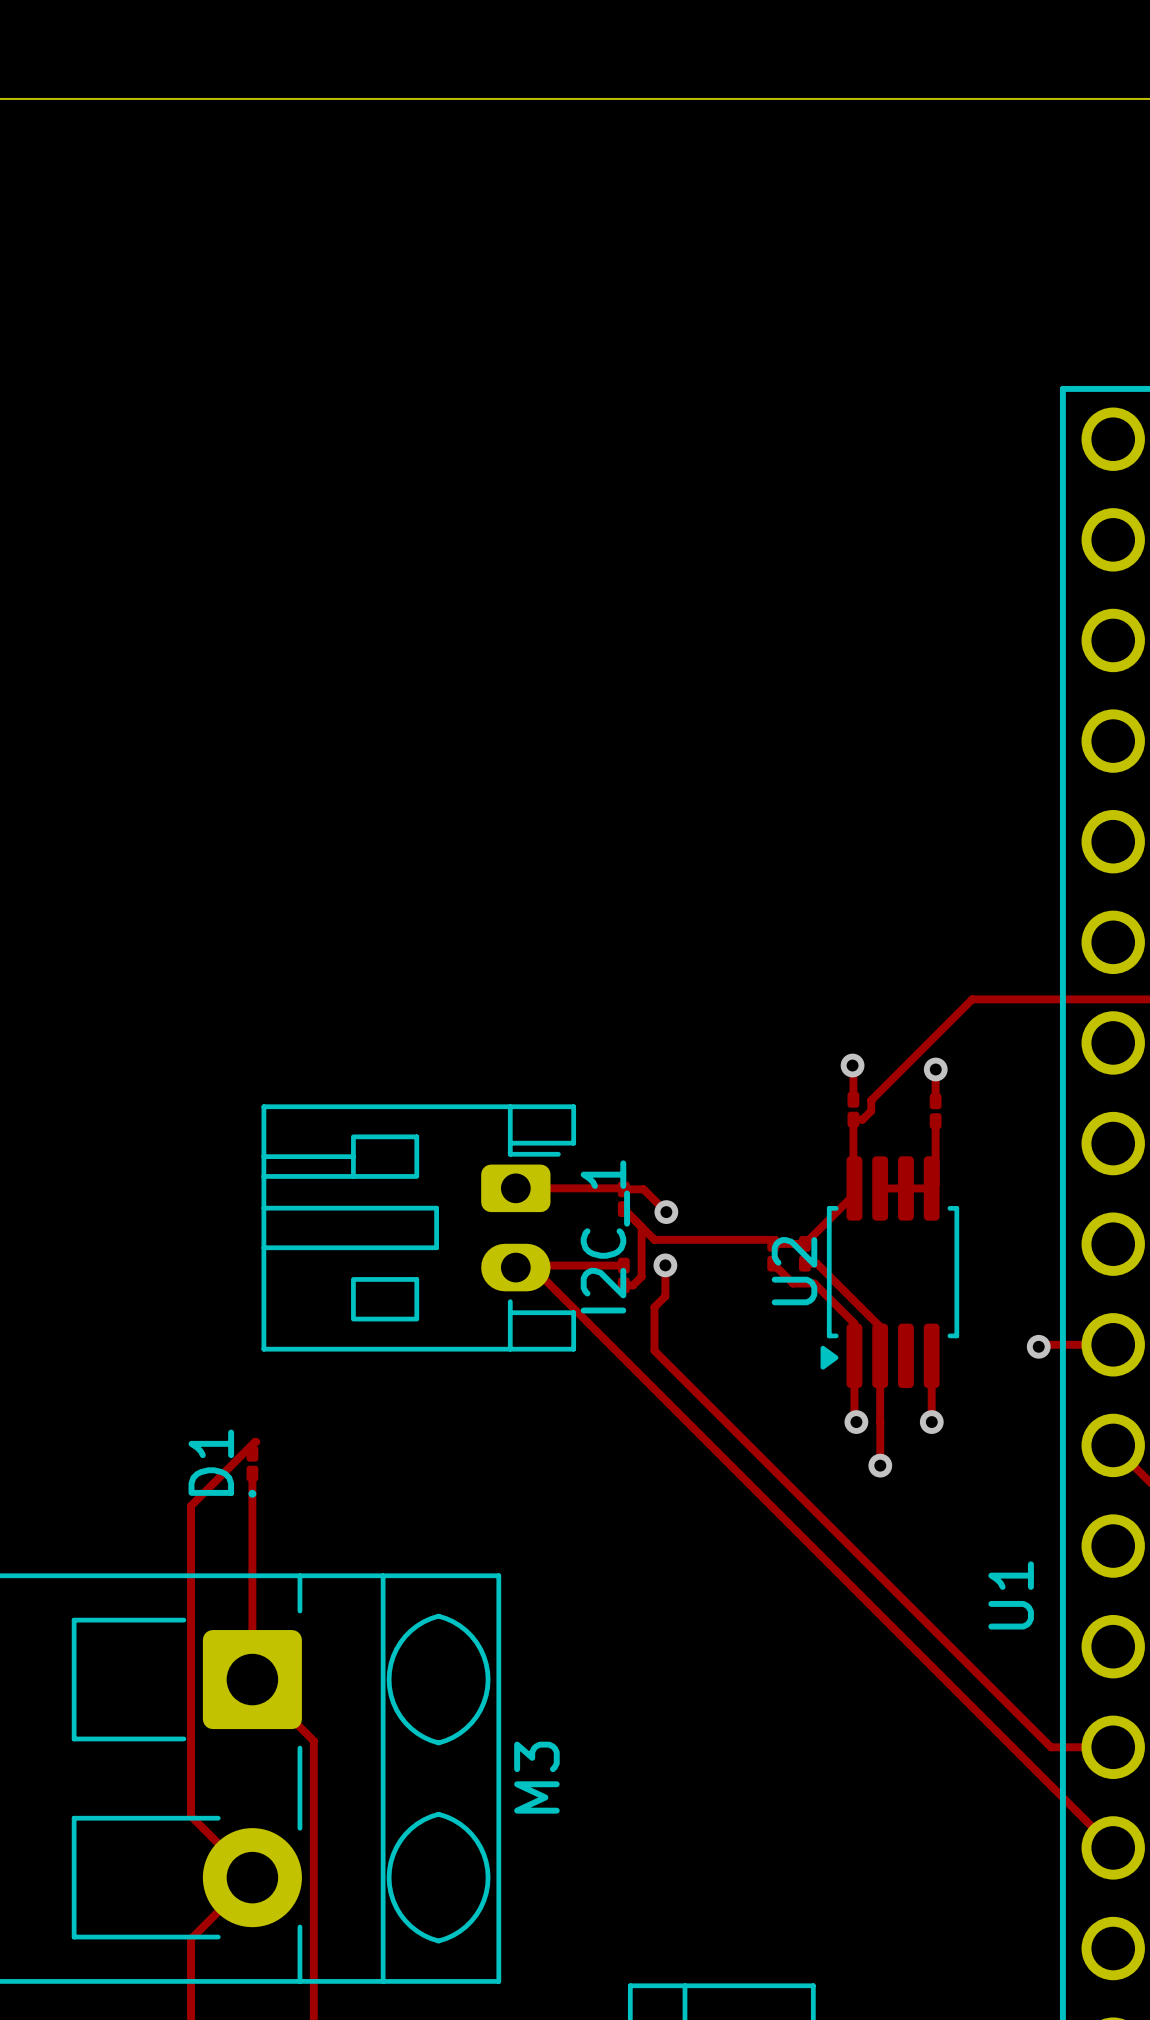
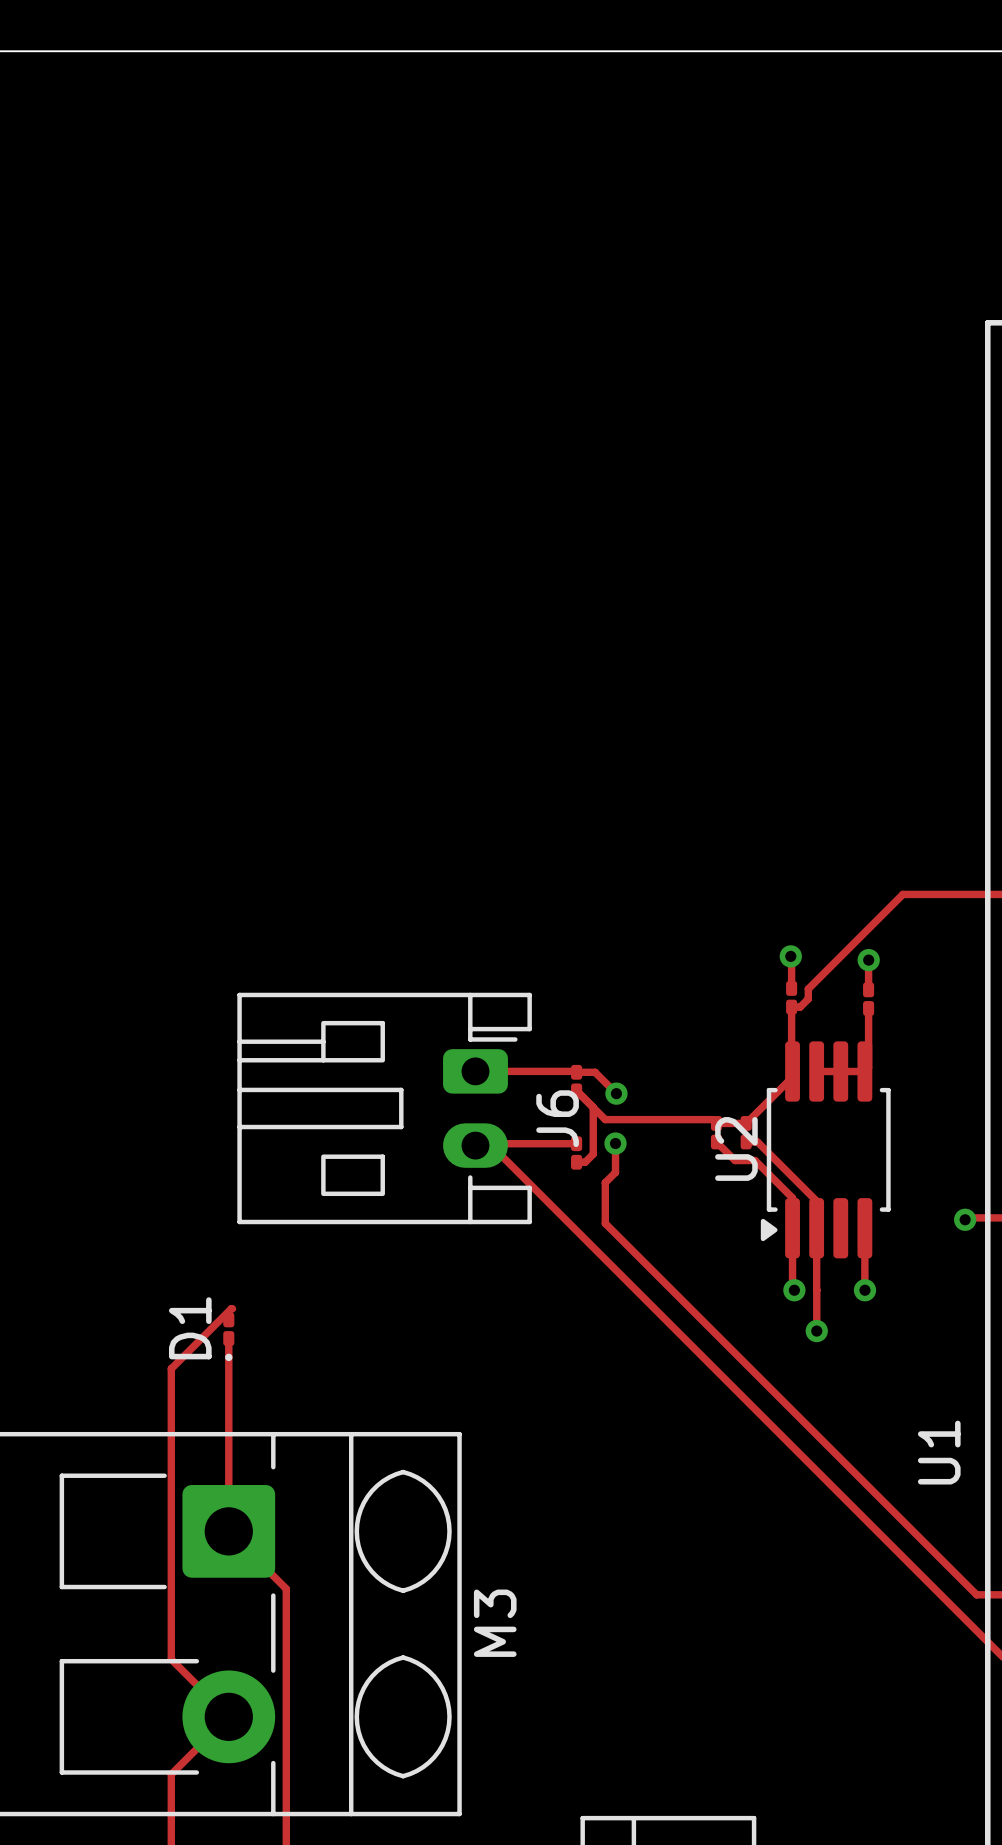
I2C_1 name: I2C_1 (605, 1236) -> J6 (557, 1118)

